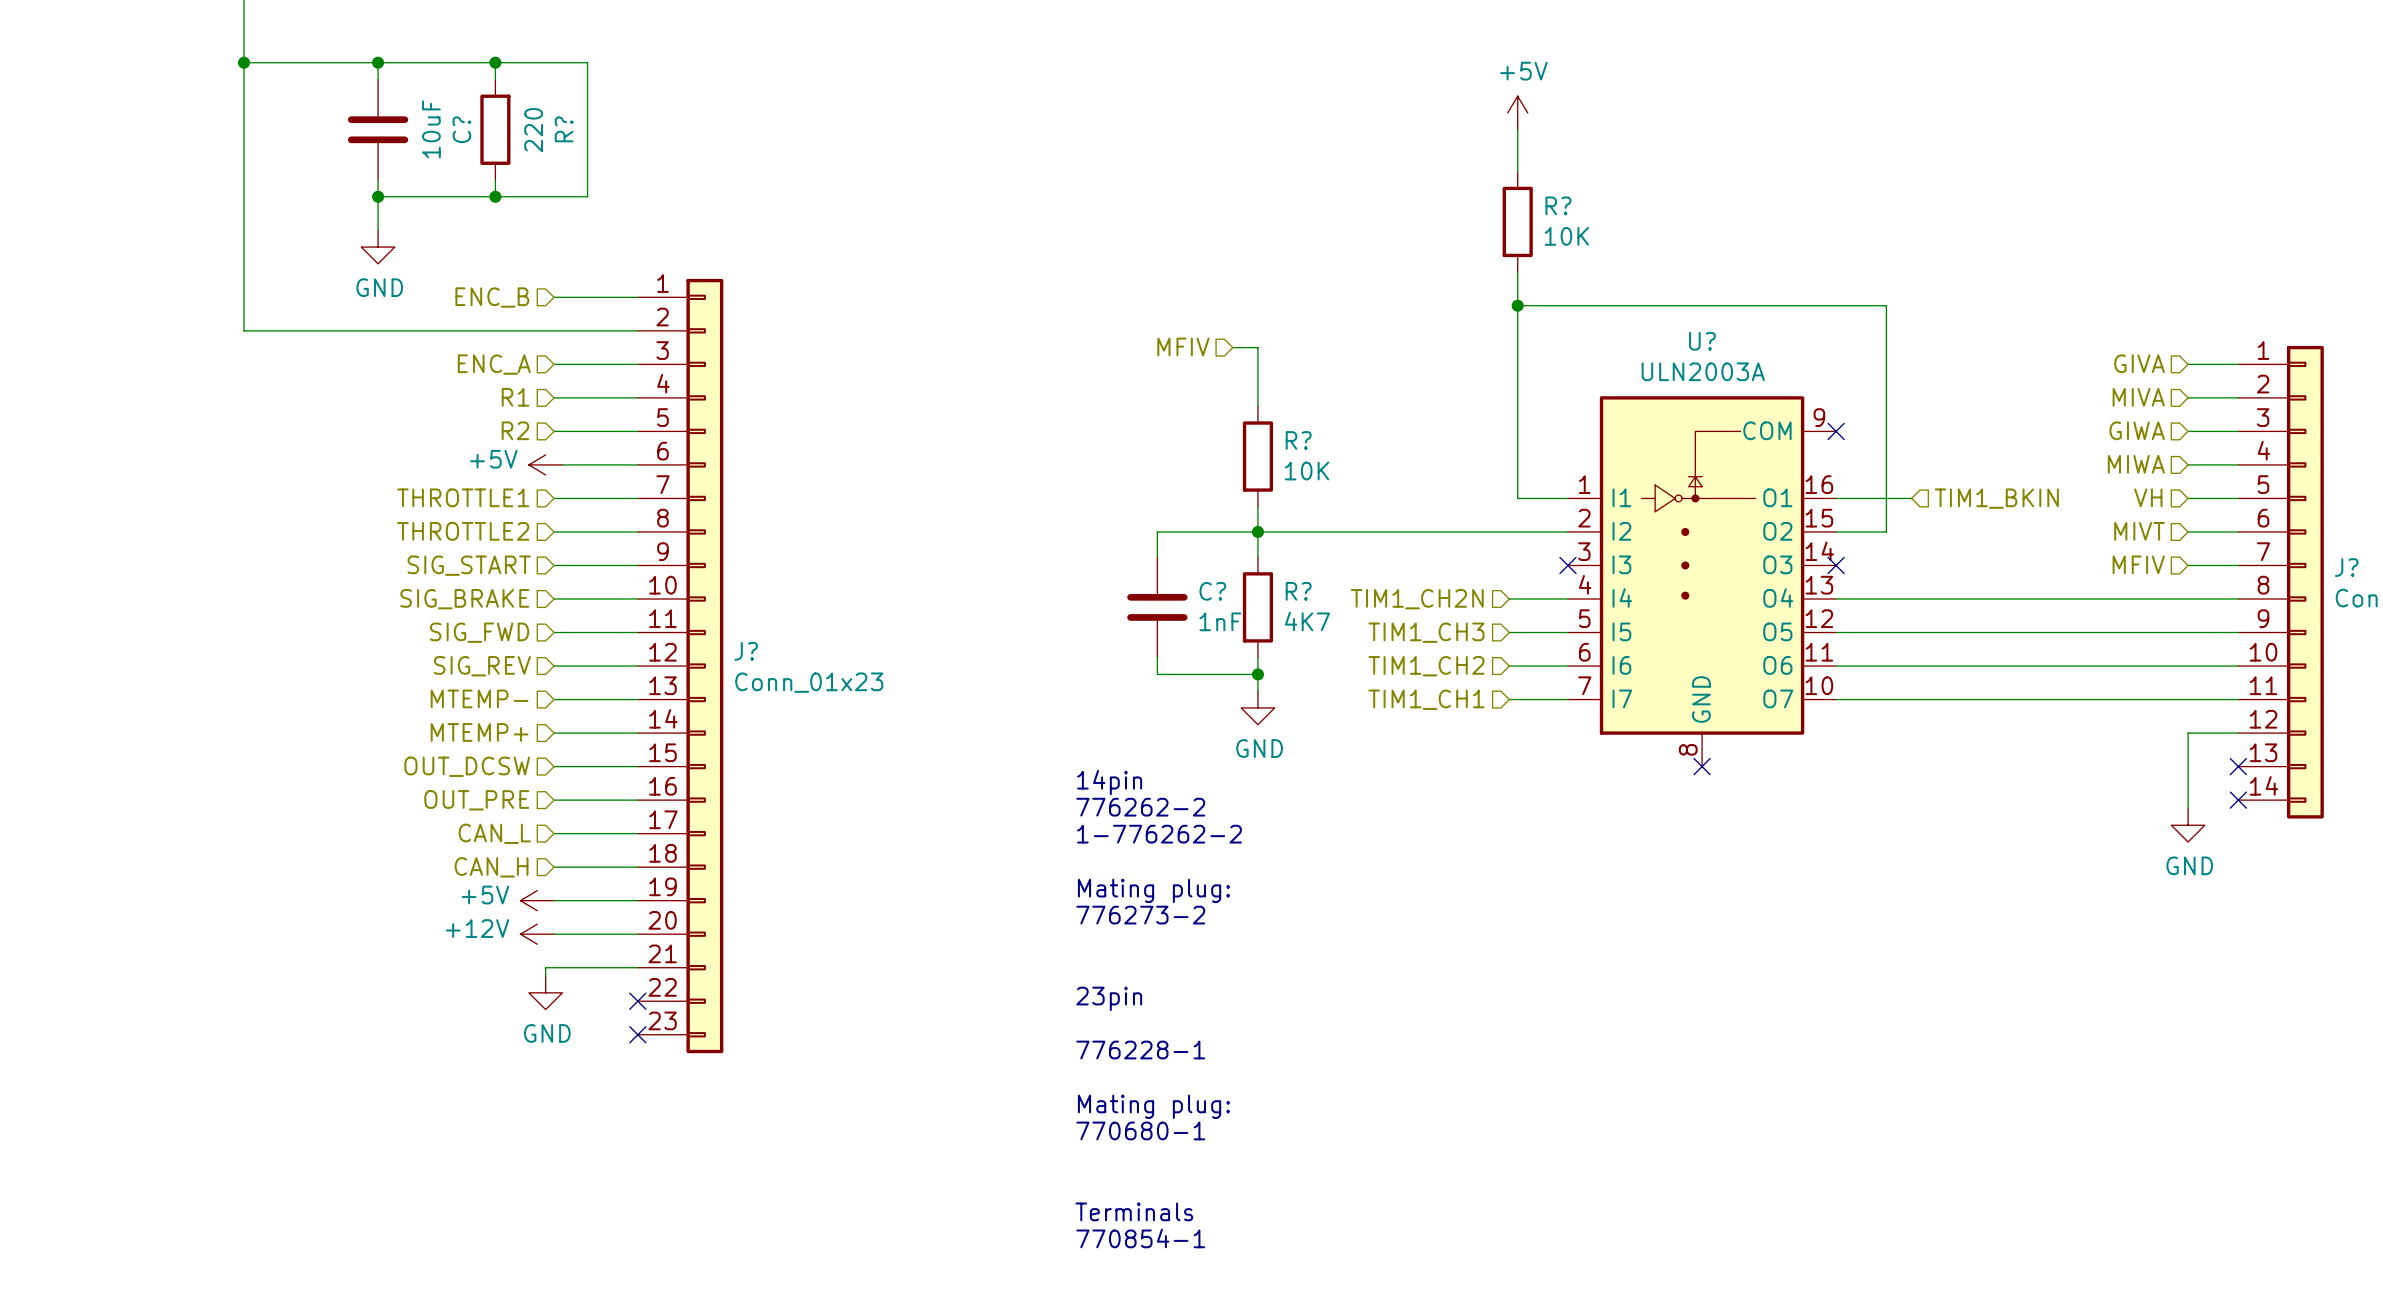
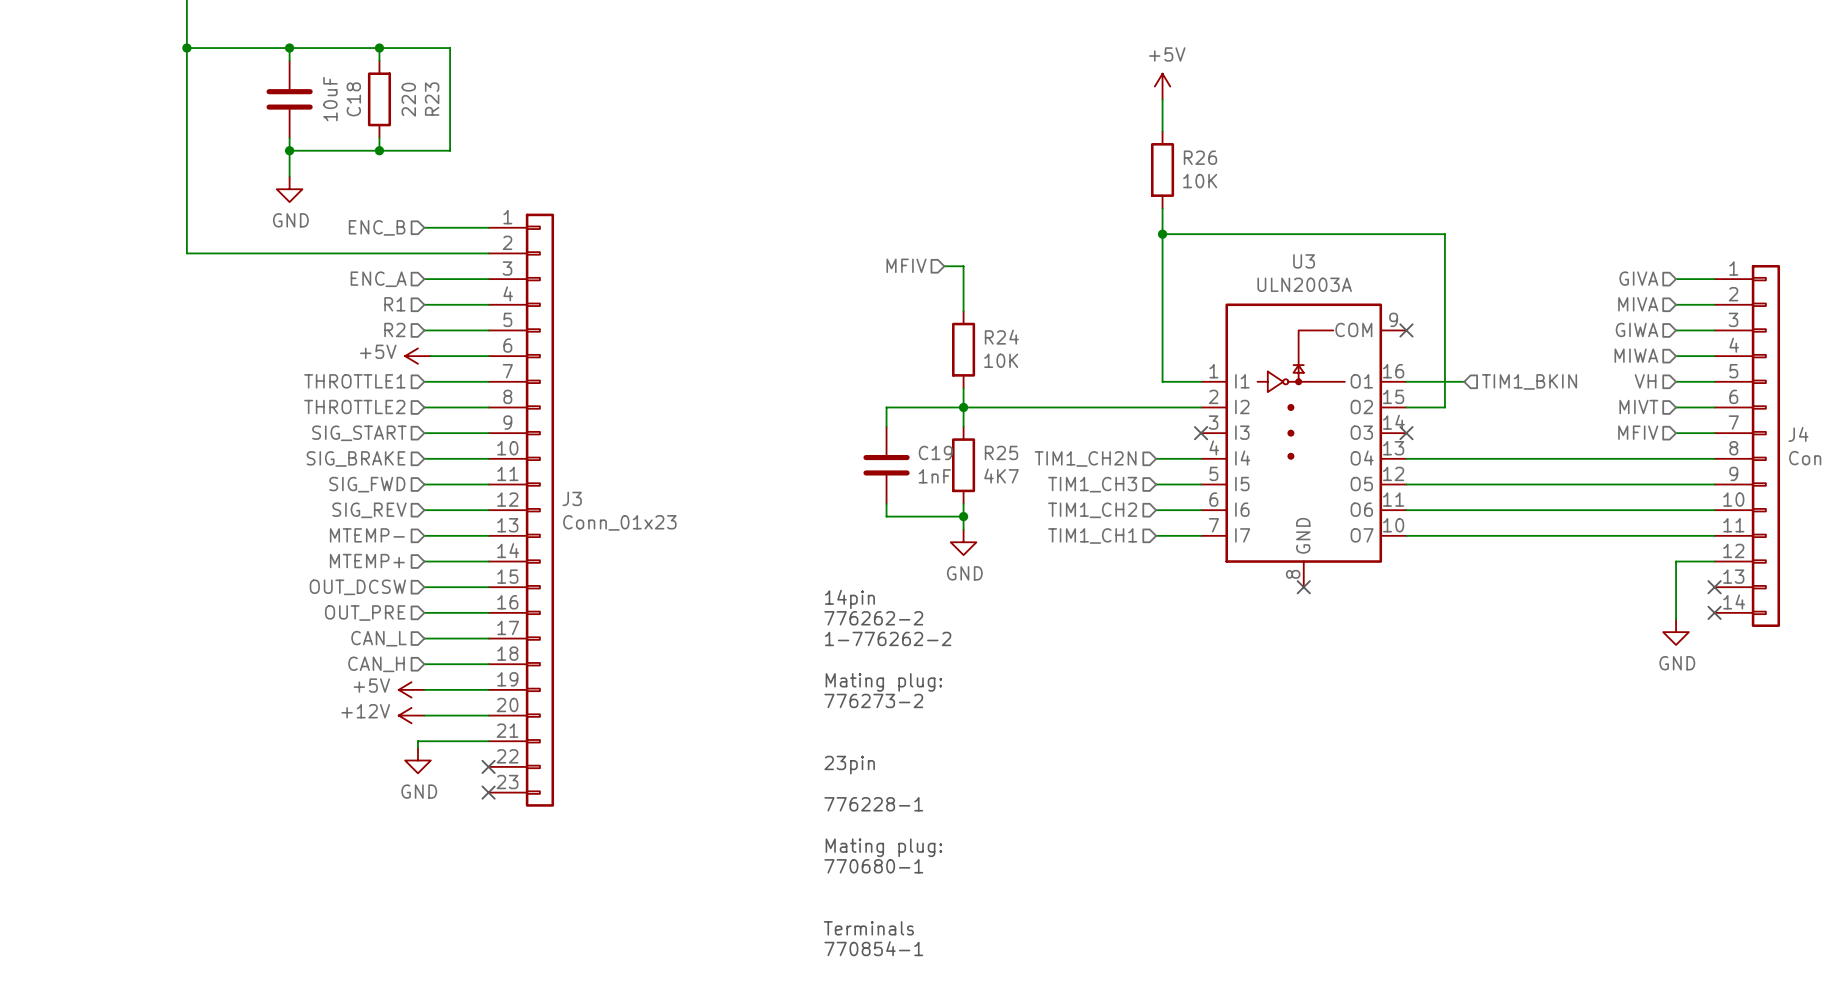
C? name: C? (461, 129) -> C18 (353, 99)
R? name: R? (564, 129) -> R23 (432, 99)
R? name: R? (1558, 205) -> R26 (1200, 157)
U? name: U? (1702, 341) -> U3 (1304, 261)
R? name: R? (1298, 440) -> R24 (1001, 337)
J? name: J? (2346, 567) -> J4 (1798, 434)
C? name: C? (1212, 591) -> C19 (935, 452)
R? name: R? (1298, 591) -> R25 (1001, 452)
J? name: J? (746, 651) -> J3 (572, 498)

